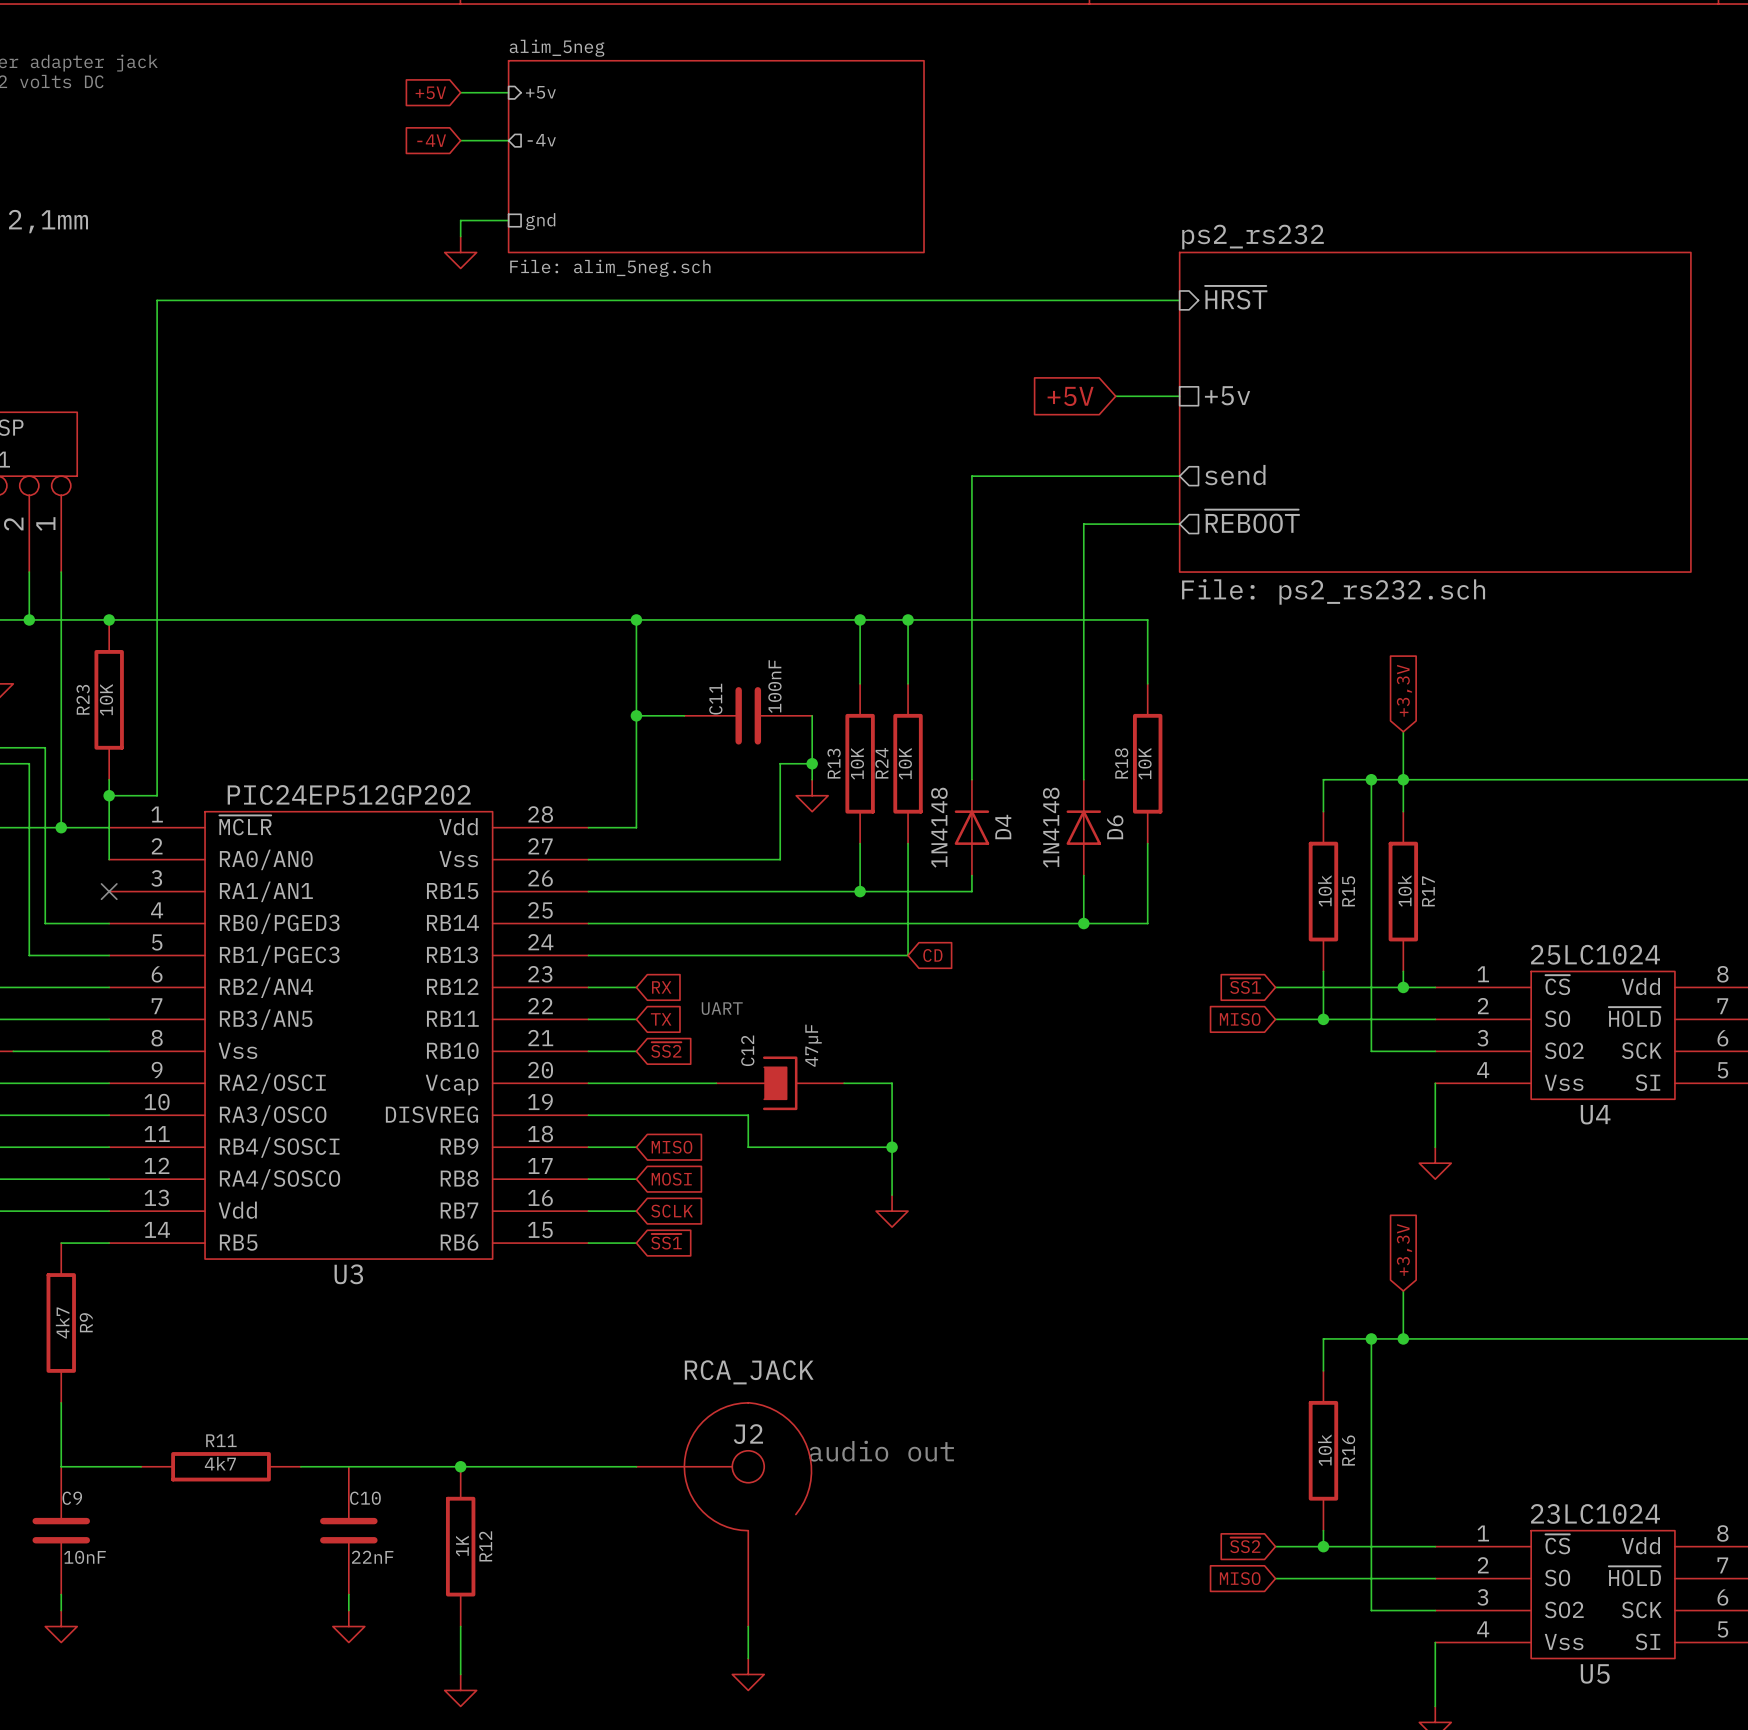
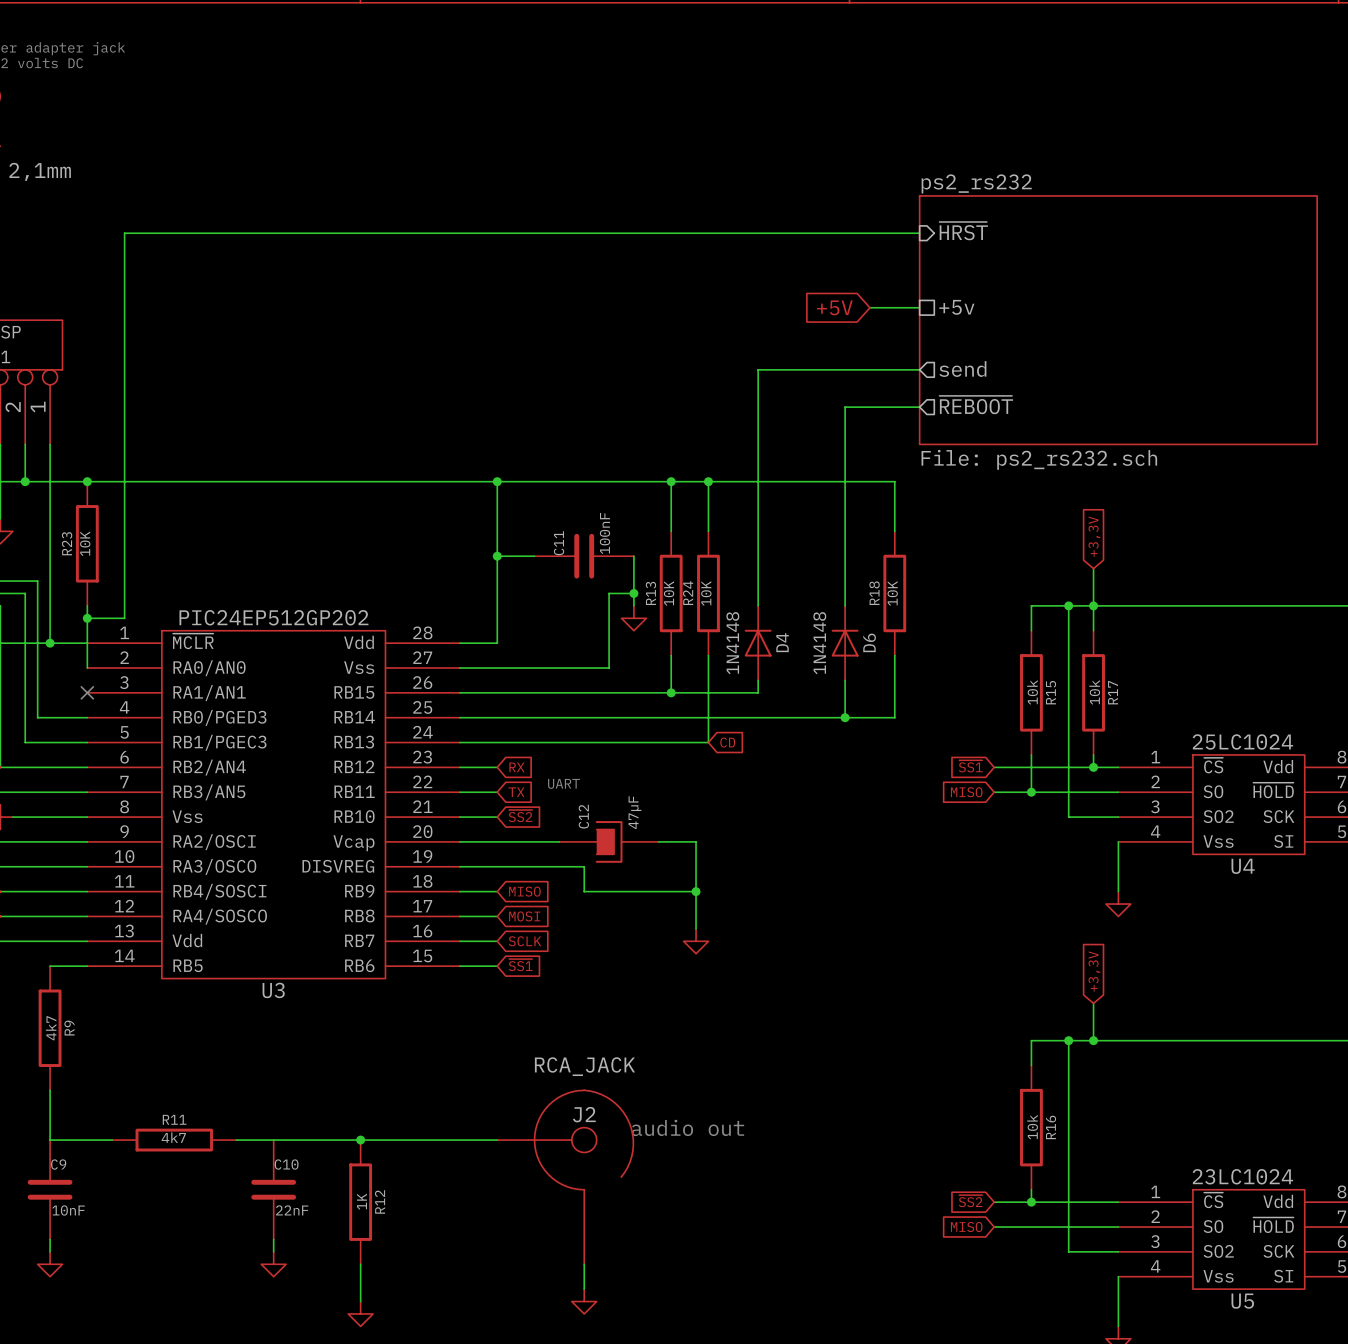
global label: +5V (430, 92) -> none
wire: (460, 92) (508, 92) -> none
sheet pin: +5v (540, 92) -> none
global label: -4V (431, 140) -> none
wire: (460, 140) (508, 140) -> none
sheet pin: -4v (541, 140) -> none
sheet alim_5neg: File: alim_5neg.sch (716, 156) -> none
wire: (508, 220) (460, 220) (460, 236) -> none
sheet pin: gnd (540, 221) -> none
power symbol: (460, 252) -> none

